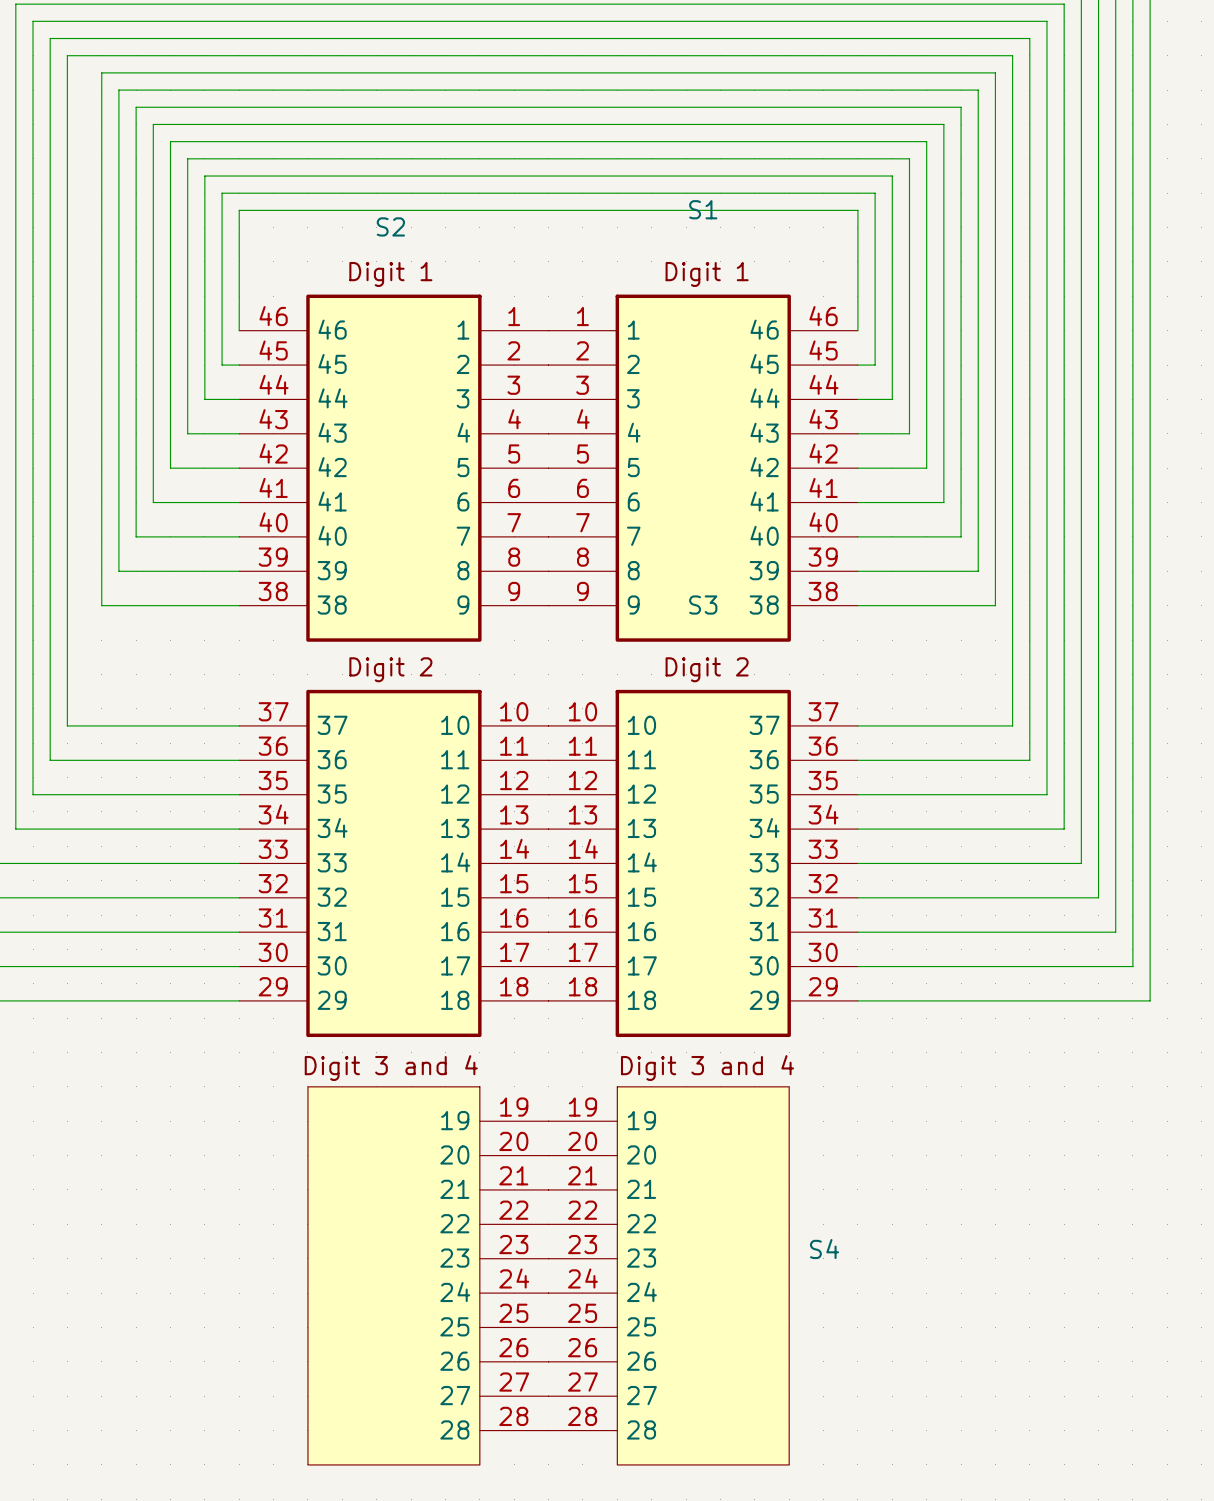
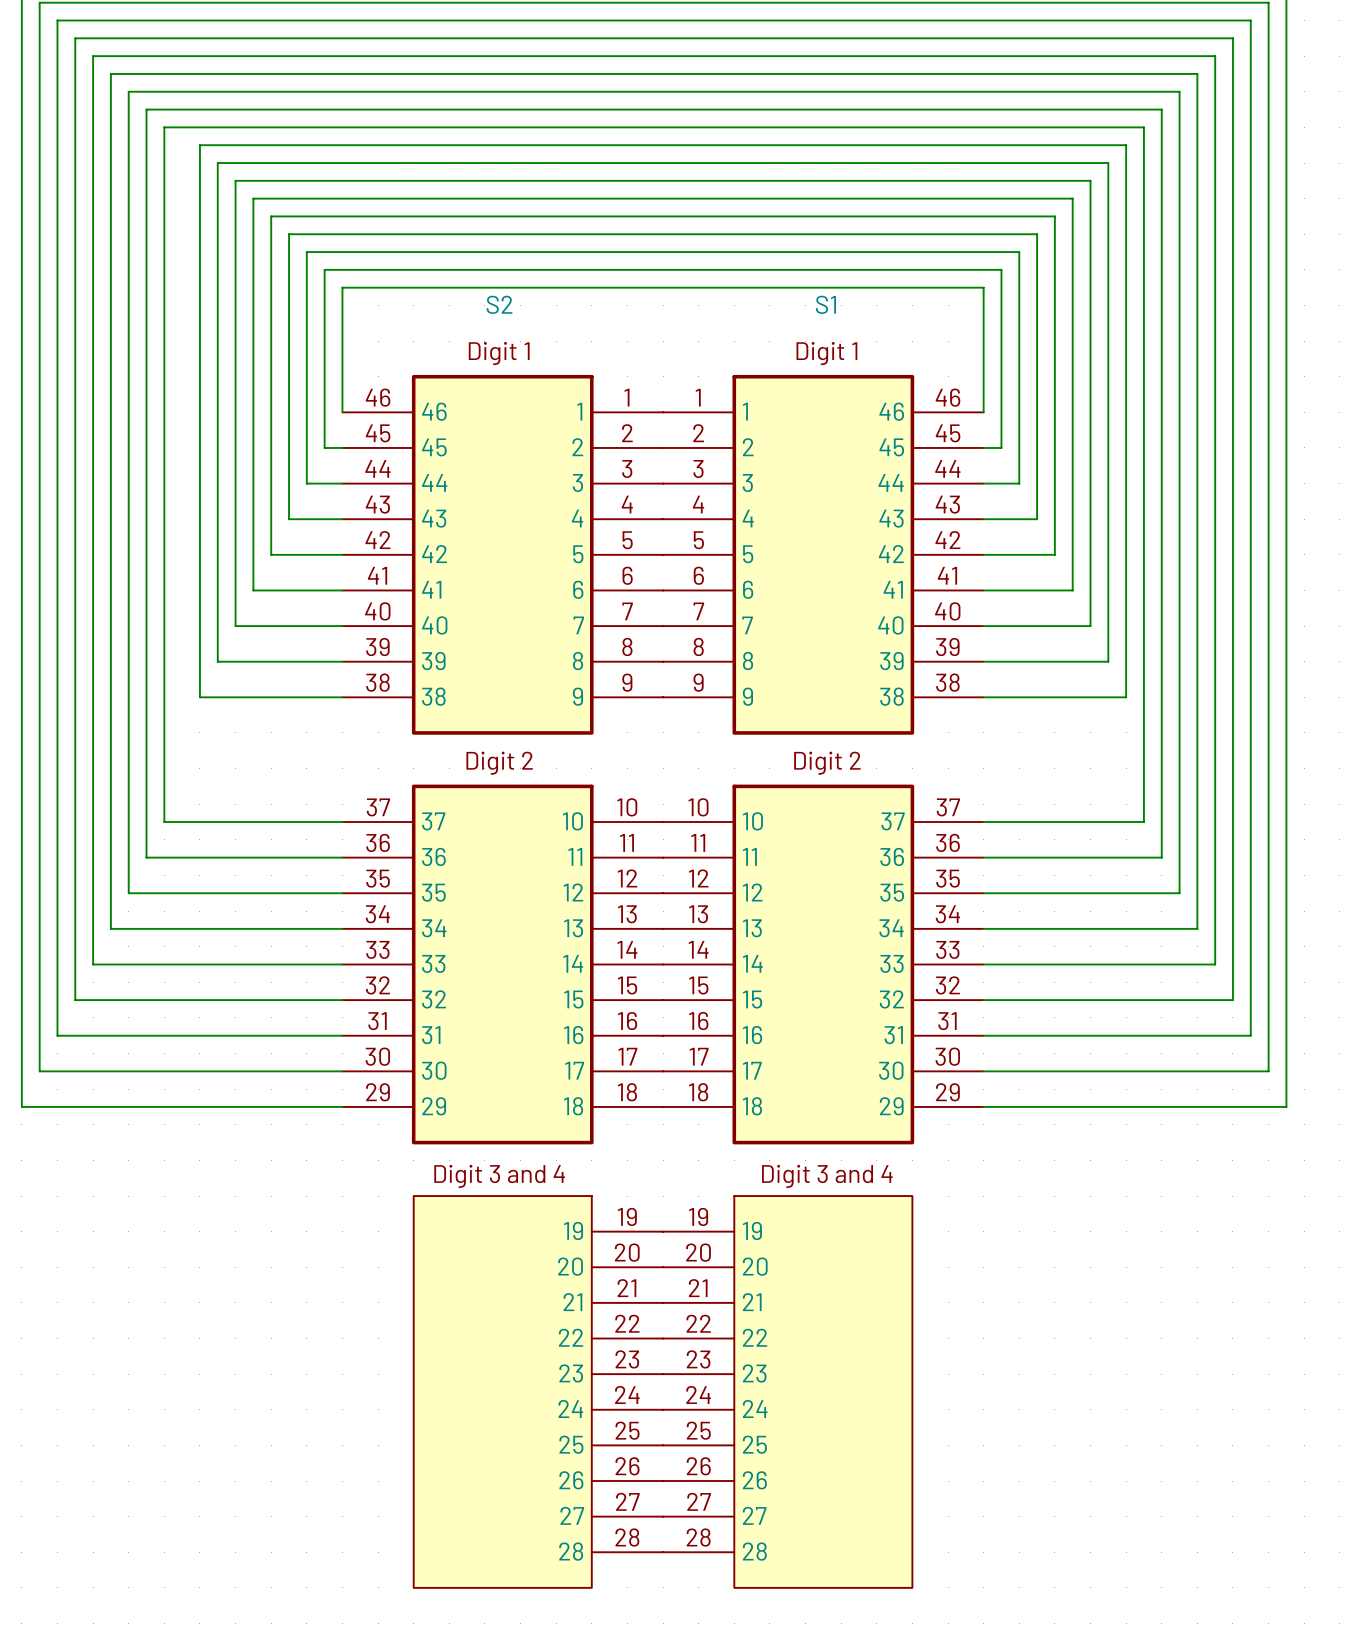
S1 name position: S1 (703, 209) -> S1 (825, 304)
S1 symbol: [548, 294, 858, 642] -> [663, 374, 984, 1588]
S3: (703, 863) -> none
S4: (668, 1275) -> none

